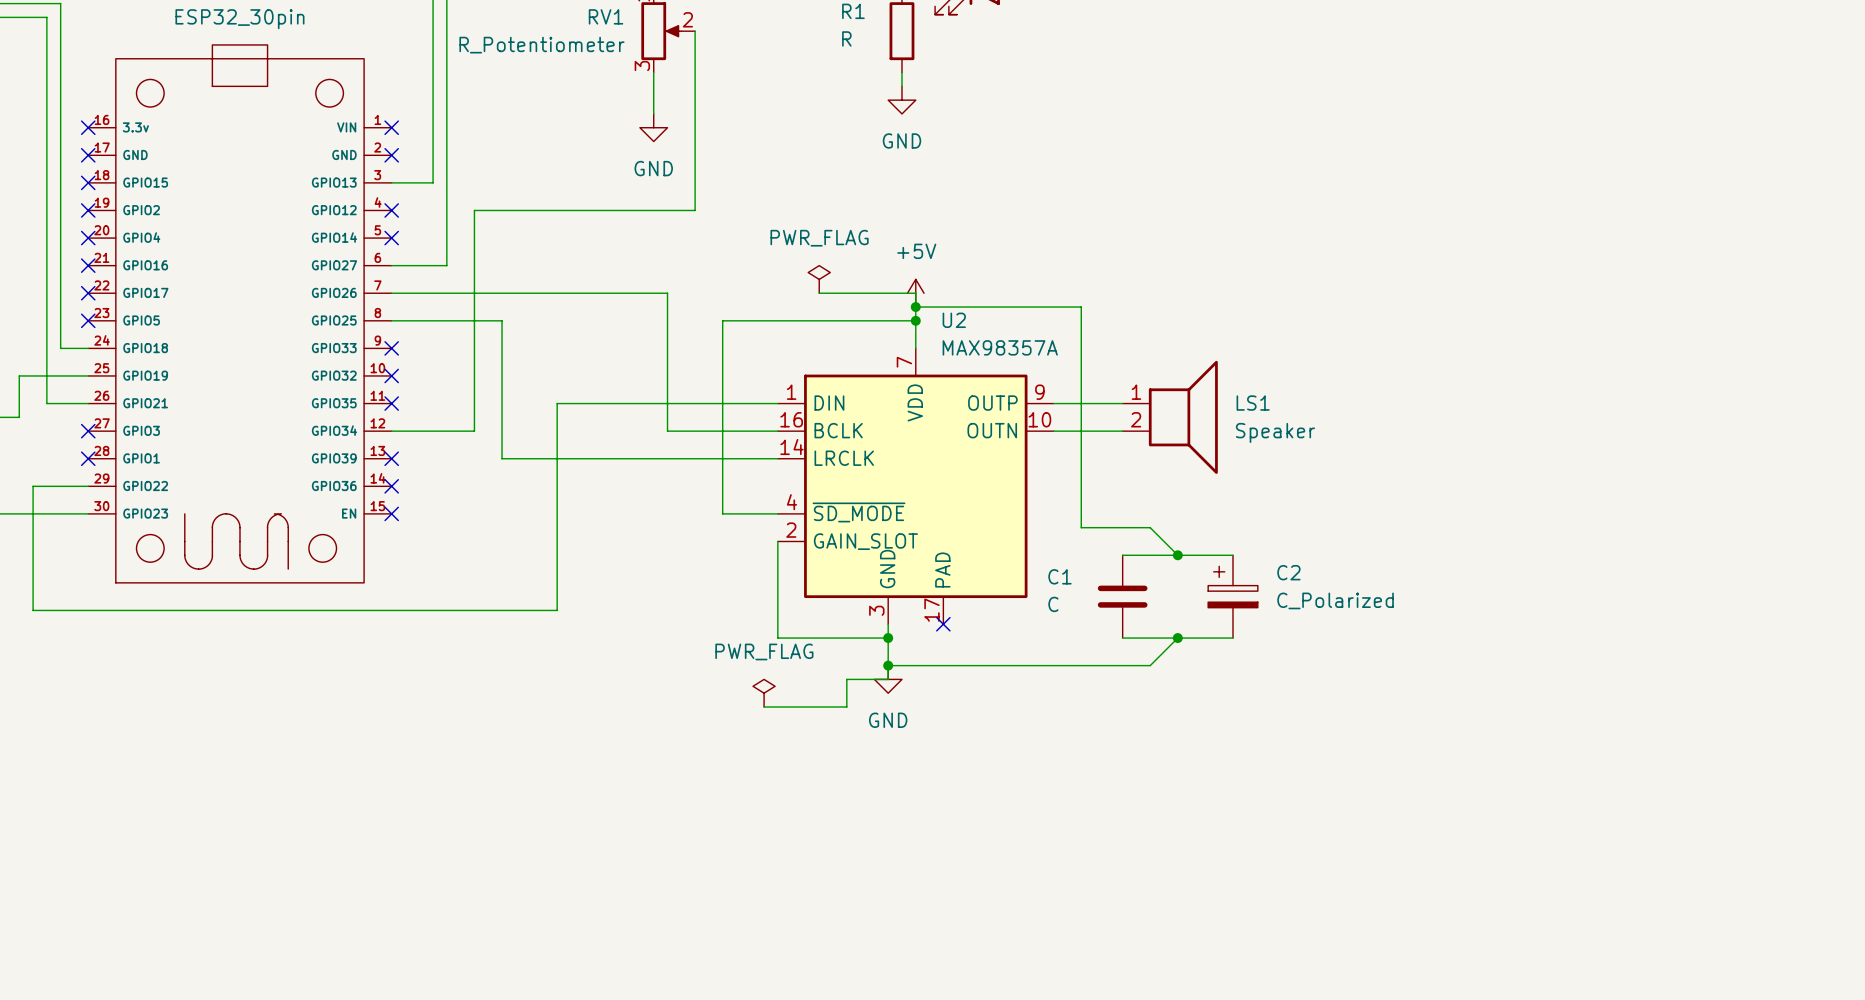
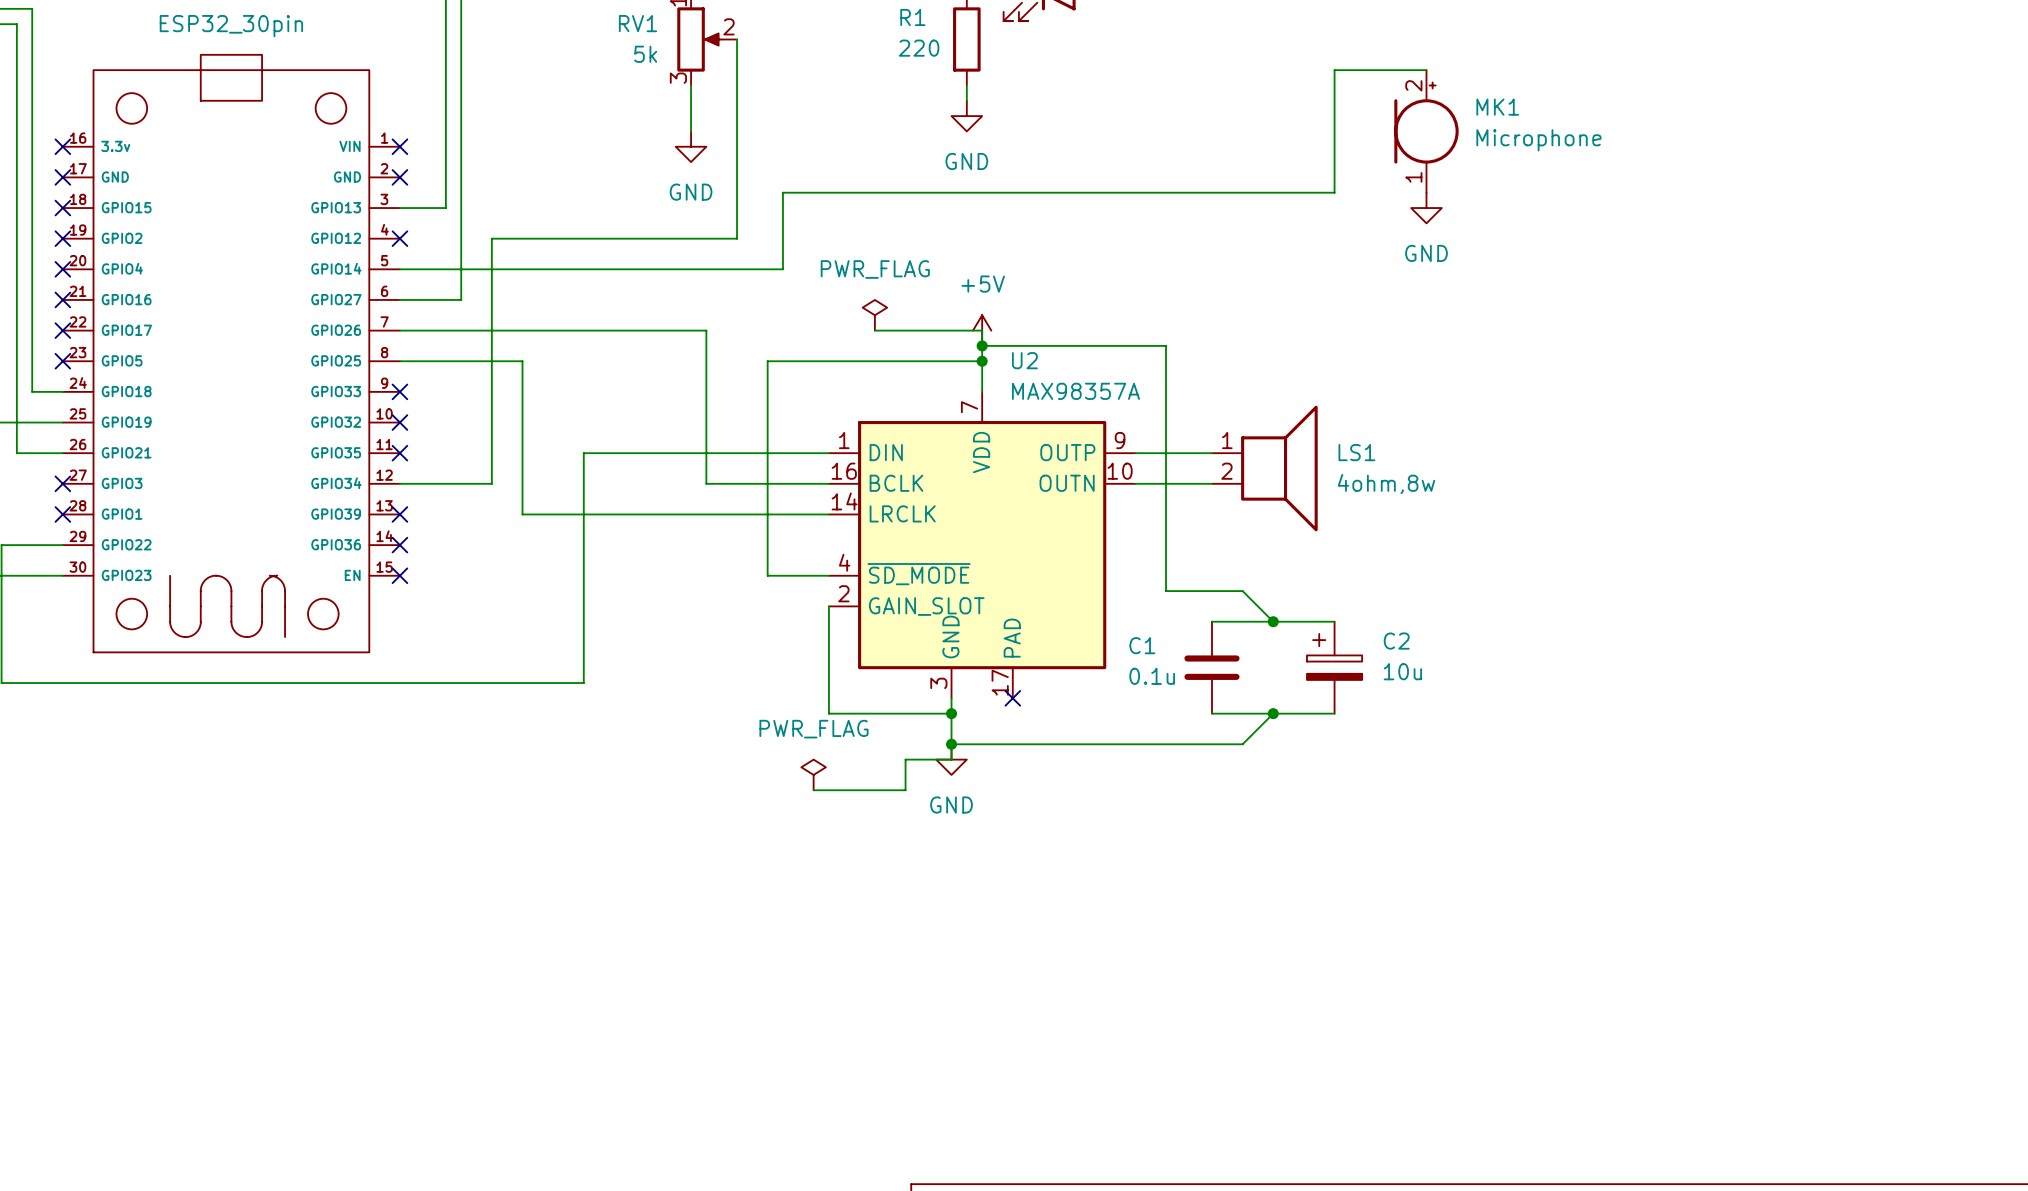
R1 value: R (846, 38) -> 220 (919, 48)
RV1 value: R_Potentiometer (541, 45) -> 5k (645, 54)
wire: none -> (1426, 70) (1334, 70) (1334, 192) (782, 192) (782, 269) (399, 269)
MK1: none -> Microphone (1426, 131)
power symbol: none -> GND (1426, 208)
no-connect mark: (391, 238) -> none
LS1 value: Speaker (1275, 432) -> 4ohm,8w (1386, 483)
C2 value: C_Polarized (1335, 600) -> 10u (1402, 671)
C1 value: C (1053, 604) -> 0.1u (1152, 676)

